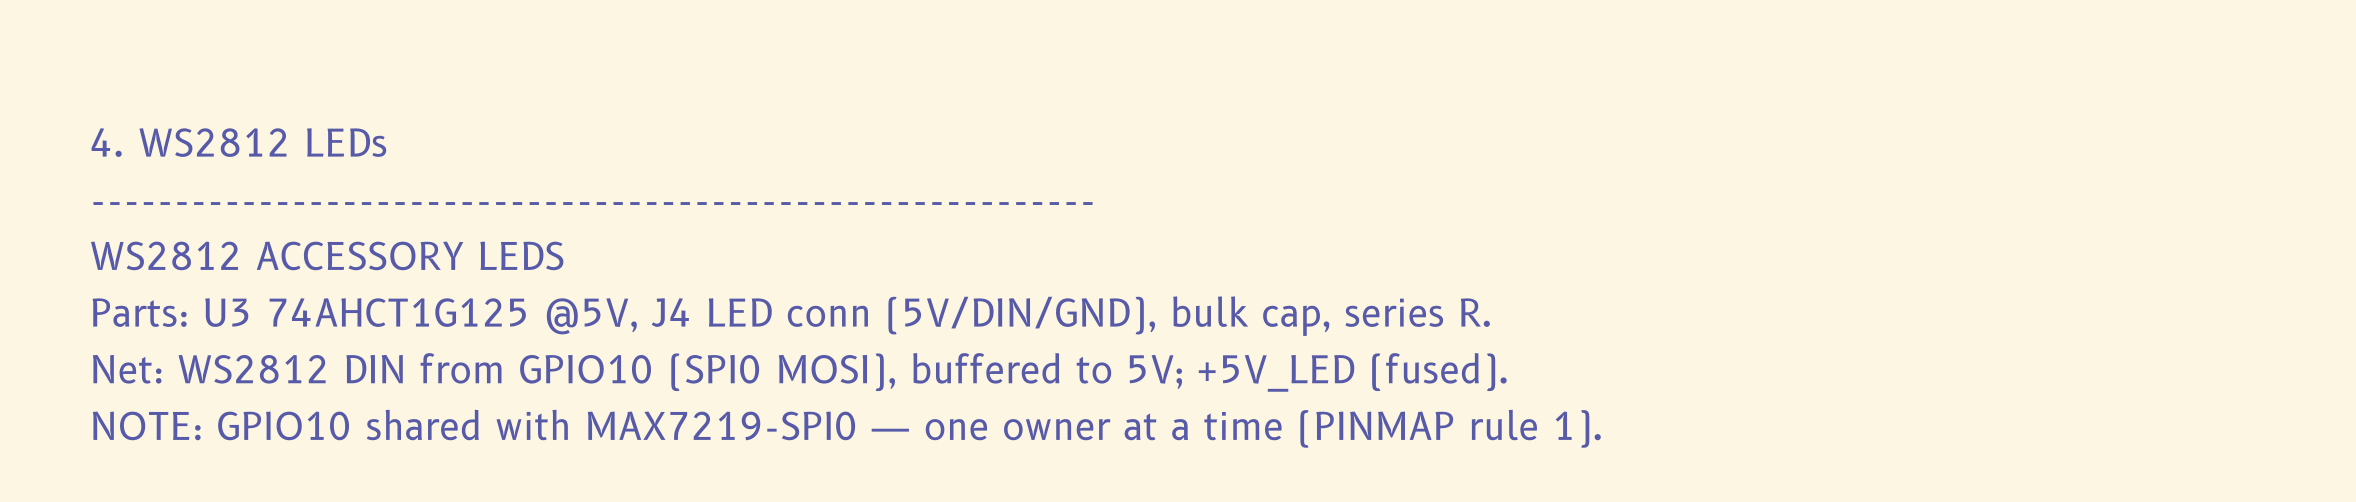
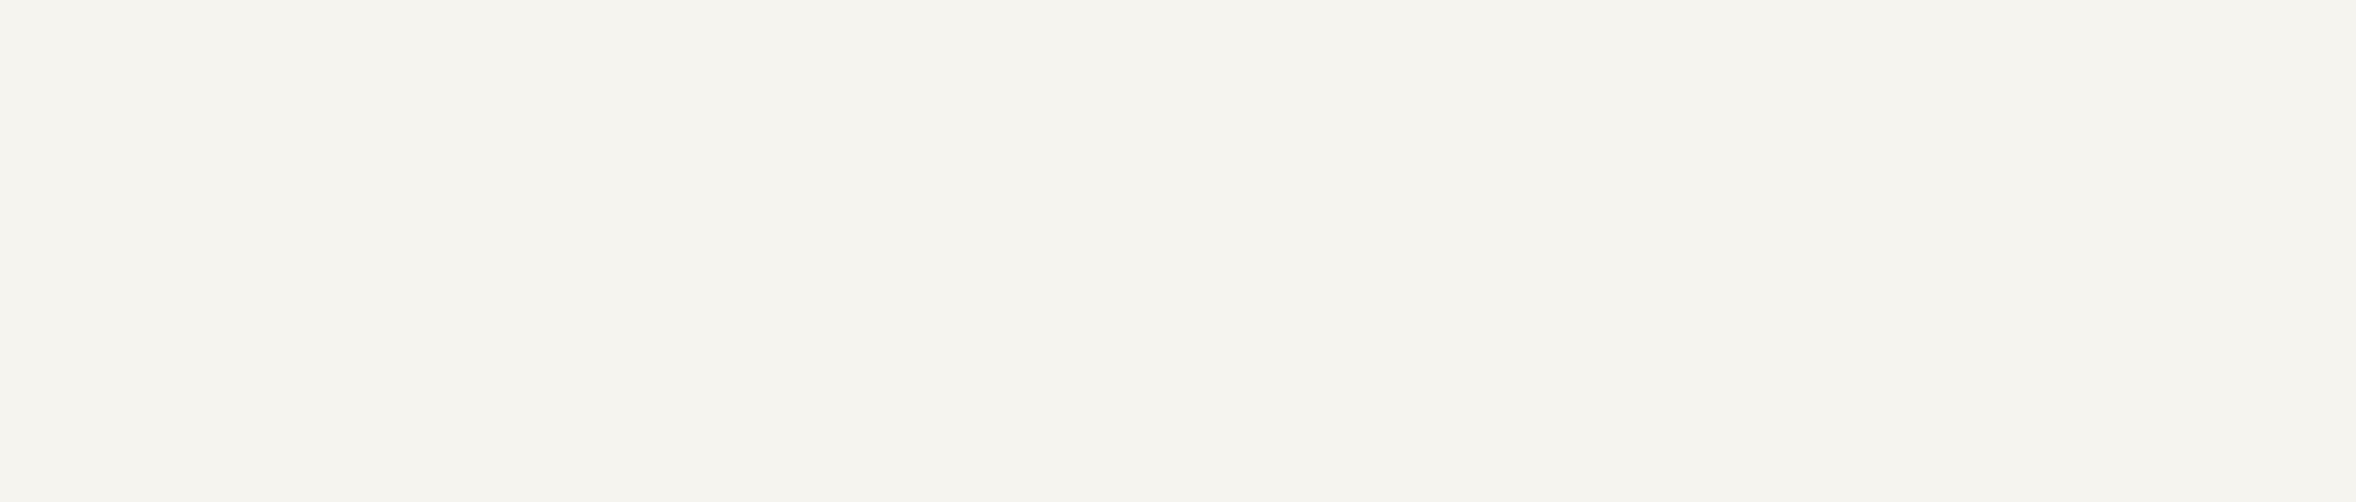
text: 4. WS2812 LEDs (238, 142) -> none
text: ------------------------------------------------------------ (593, 203) -> none
text: WS2812 ACCESSORY LEDS (327, 255) -> none
text: Parts: U3 74AHCT1G125 @5V, J4 LED conn (5V/DIN/GND), bulk cap, series R. (791, 316) -> none
text: Net: WS2812 DIN from GPIO10 (SPI0 MOSI), buffered to 5V; +5V_LED (fused). (799, 372) -> none
text: NOTE: GPIO10 shared with MAX7219-SPI0 — one owner at a time (PINMAP rule 1). (846, 428) -> none

